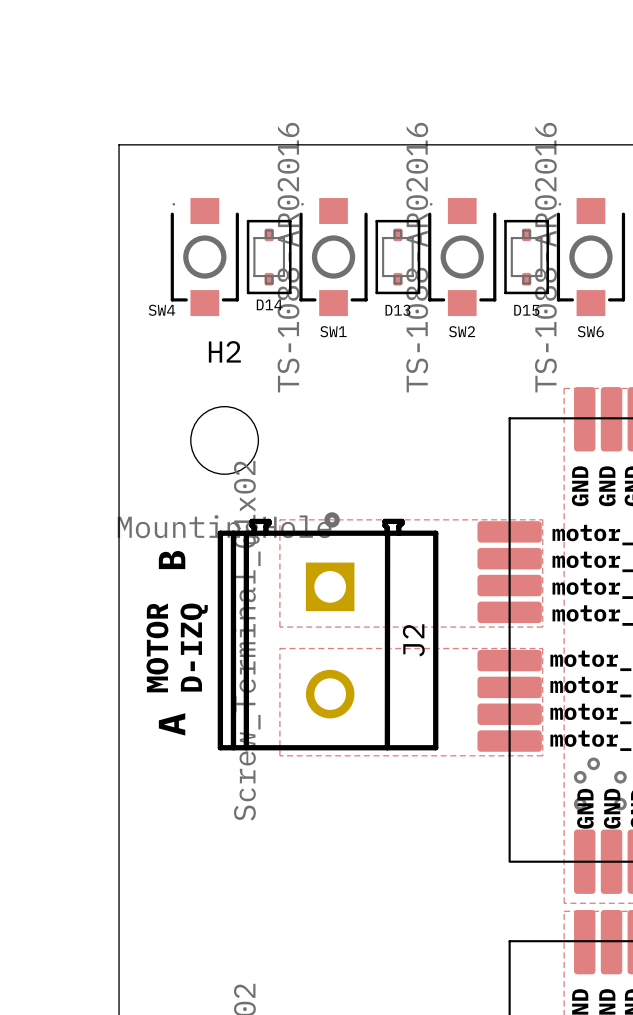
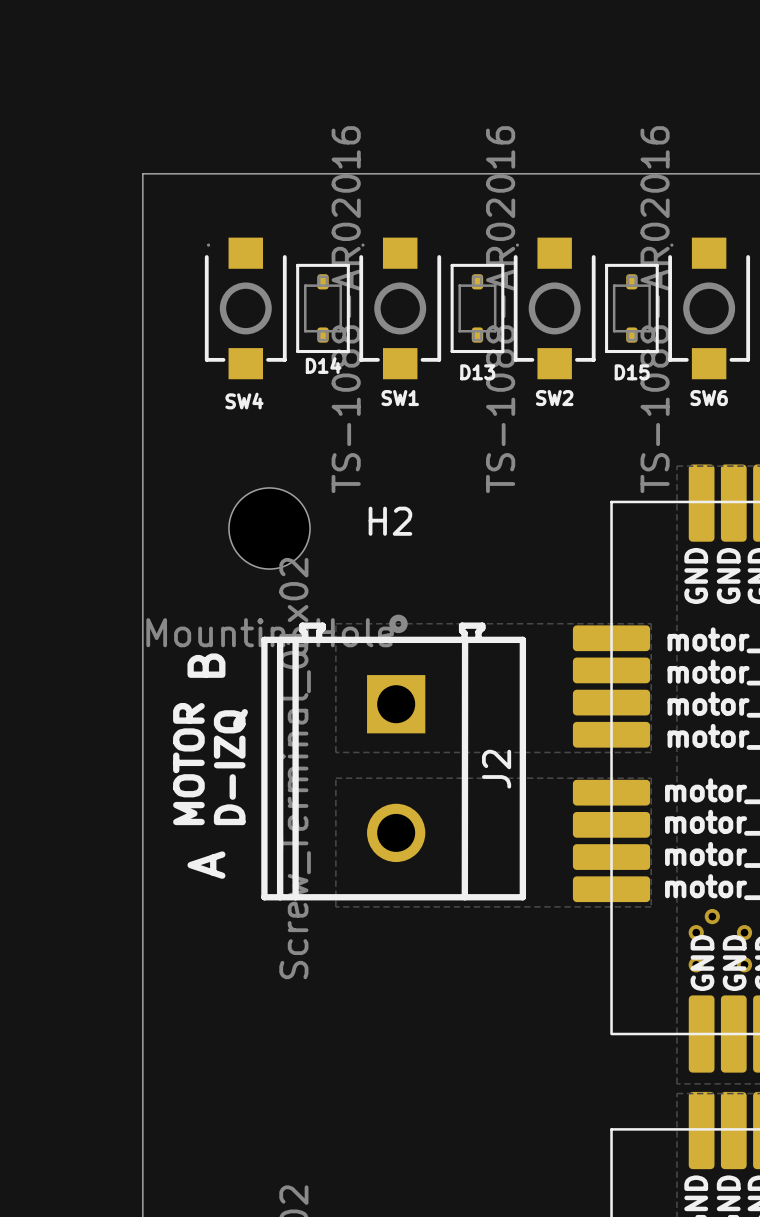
SW4 name position: SW4 (161, 310) -> SW4 (244, 401)
H2 name position: H2 (224, 351) -> H2 (390, 521)

